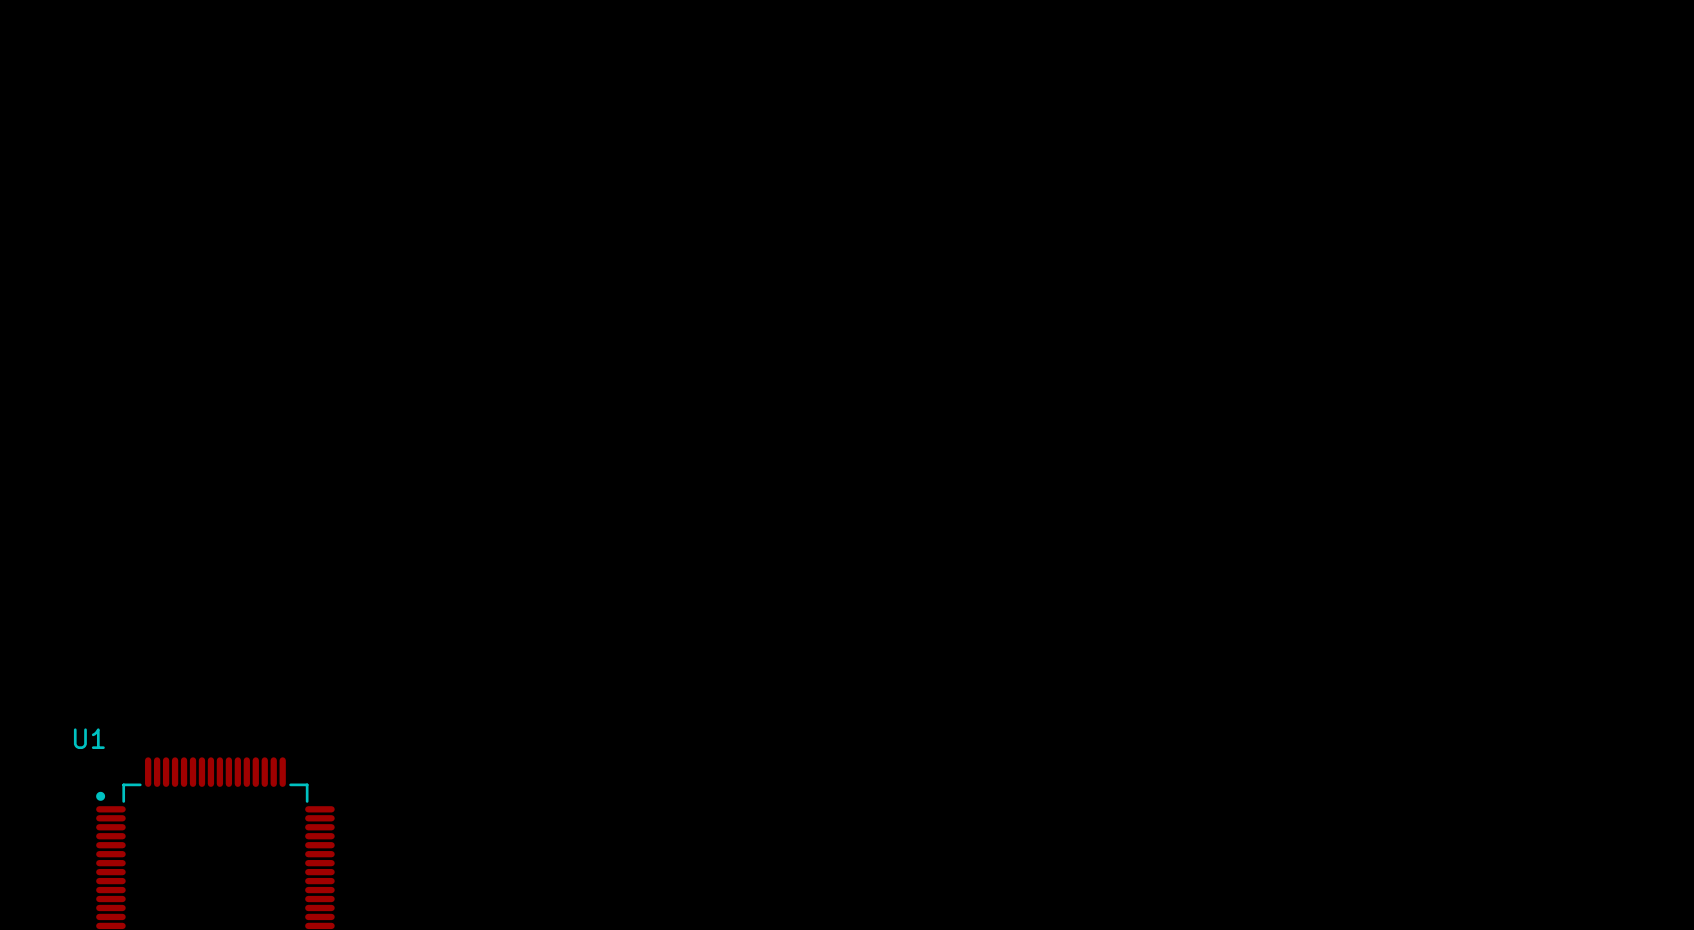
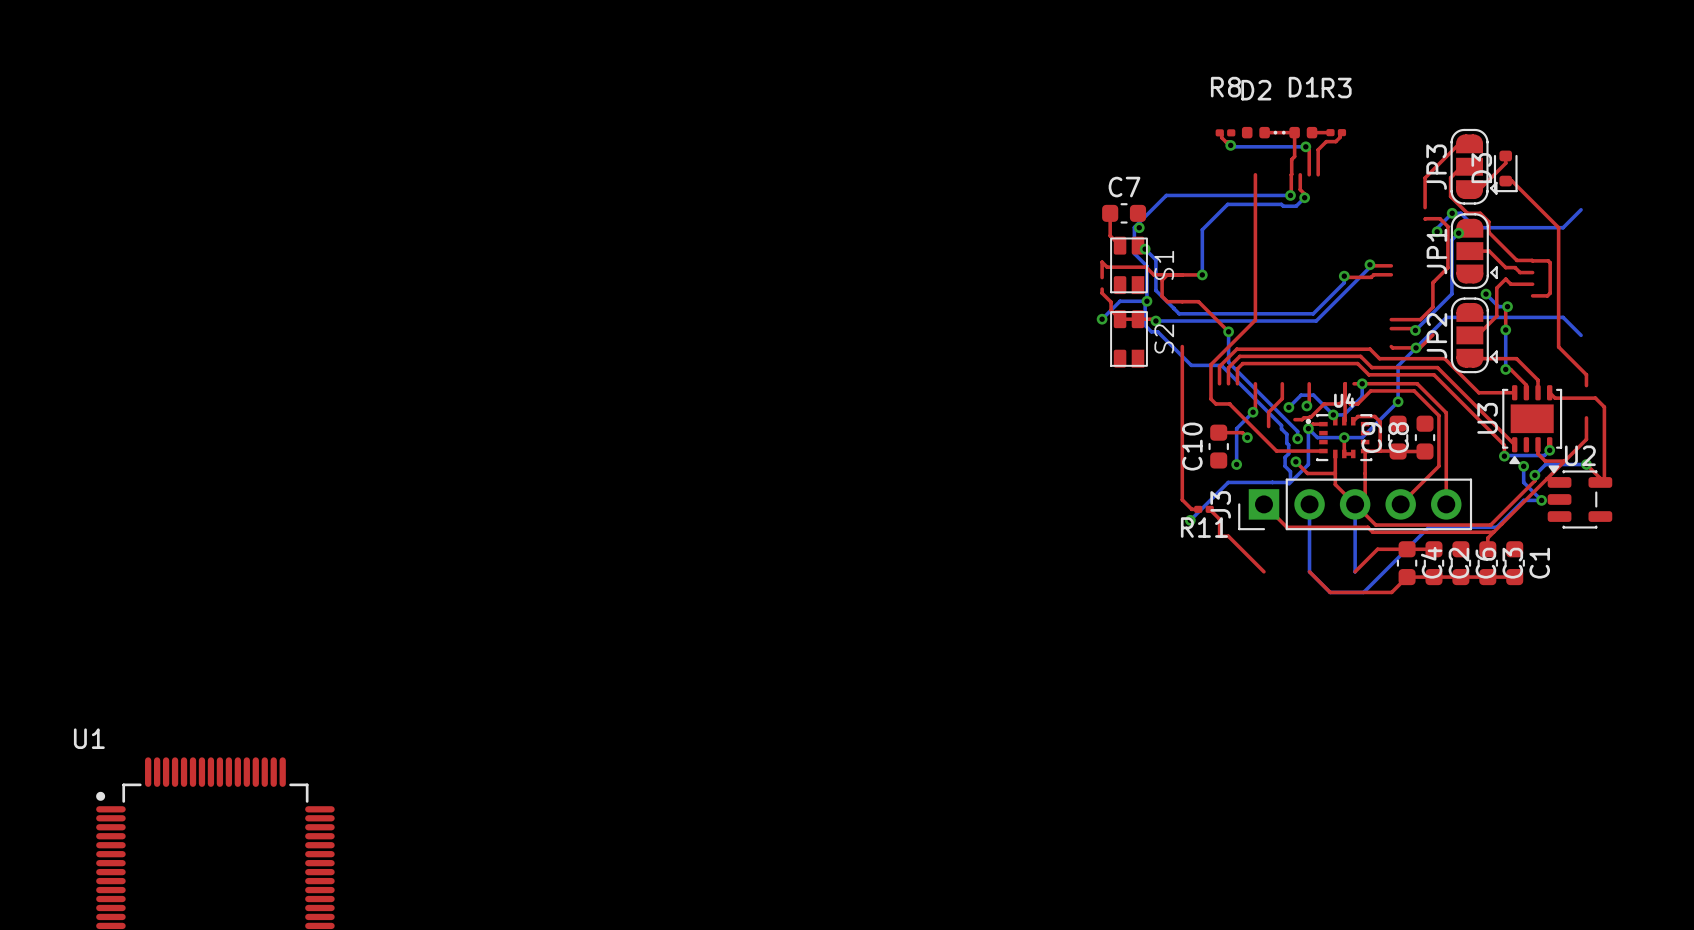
top track: none -> (1219, 132) (1221, 137) (1230, 145)
R8: none -> (1225, 132)
D2: none -> (1259, 132)
top track: none -> (1264, 132) (1294, 132) (1294, 156) (1291, 159) (1290, 195)
D1: none -> (1299, 132)
top track: none -> (1312, 132) (1330, 132)
R3: none -> (1336, 132)
top track: none -> (1341, 132) (1340, 132) (1340, 137) (1335, 141) (1326, 141) (1318, 149) (1318, 174)
top track: none -> (1469, 143) (1459, 143) (1425, 177) (1425, 207)
bottom track: none -> (1230, 145) (1305, 146)
via: none -> (1230, 145)
top track: none -> (1305, 146) (1309, 150) (1309, 174)
via: none -> (1305, 146)
top track: none -> (1505, 155) (1505, 163) (1478, 190) (1469, 190)
JP3: none -> (1474, 166)
top track: none -> (1477, 166) (1461, 166) (1450, 177) (1450, 196) (1467, 213) (1480, 213) (1488, 221) (1488, 232) (1516, 260) (1548, 260) (1550, 262) (1550, 293) (1547, 295) (1532, 295)
D3: none -> (1505, 171)
top track: none -> (1255, 174) (1255, 320) (1210, 364) (1210, 399) (1215, 403) (1229, 403) (1276, 451) (1323, 451)
top track: none -> (1300, 174) (1300, 189) (1304, 194) (1304, 197)
top track: none -> (1505, 181) (1512, 181) (1558, 227) (1558, 346) (1586, 374) (1586, 385)
bottom track: none -> (1290, 195) (1166, 195) (1134, 227) (1134, 253) (1146, 266) (1146, 301)
via: none -> (1290, 195)
bottom track: none -> (1304, 197) (1296, 206) (1227, 204) (1202, 229) (1202, 274)
via: none -> (1304, 197)
bottom track: none -> (1581, 209) (1563, 227) (1475, 227) (1460, 213) (1452, 213) (1437, 228) (1437, 231)
top track: none -> (1110, 213) (1110, 235) (1120, 245)
C7: none -> (1124, 213)
via: none -> (1452, 213)
top track: none -> (1425, 219) (1440, 218) (1447, 226) (1447, 267) (1432, 282) (1432, 307) (1420, 319) (1391, 319)
via: none -> (1139, 227)
via: none -> (1437, 231)
bottom track: none -> (1458, 233) (1451, 239) (1451, 293) (1415, 330)
via: none -> (1458, 233)
bottom track: none -> (1145, 249) (1155, 259) (1155, 290) (1179, 313) (1313, 313) (1344, 282) (1344, 276)
via: none -> (1145, 249)
top track: none -> (1469, 251) (1489, 251) (1505, 267) (1515, 267) (1520, 272) (1532, 272)
JP1: none -> (1474, 251)
top track: none -> (1369, 264) (1391, 265)
bottom track: none -> (1369, 264) (1369, 267) (1316, 321) (1155, 321)
via: none -> (1369, 264)
S1: none -> (1129, 265)
top track: none -> (1167, 274) (1162, 280) (1162, 296) (1167, 301) (1198, 301) (1228, 331)
top track: none -> (1182, 274) (1153, 274) (1146, 267) (1107, 267) (1102, 262) (1102, 277)
top track: none -> (1182, 274) (1202, 274)
via: none -> (1202, 274)
top track: none -> (1391, 274) (1373, 274) (1371, 277) (1344, 276)
via: none -> (1344, 276)
top track: none -> (1532, 284) (1510, 284) (1505, 279) (1496, 288) (1496, 316) (1477, 335) (1469, 335)
top track: none -> (1102, 289) (1102, 293) (1111, 302) (1111, 310) (1120, 319) (1154, 319) (1155, 321)
bottom track: none -> (1486, 294) (1498, 306) (1507, 306)
via: none -> (1486, 294)
bottom track: none -> (1146, 301) (1120, 301) (1102, 319)
bottom track: none -> (1146, 301) (1145, 303) (1145, 325) (1151, 331) (1157, 331) (1191, 365) (1221, 365) (1281, 425) (1281, 428) (1286, 434) (1288, 453) (1285, 457) (1285, 466) (1290, 471) (1290, 479) (1287, 482) (1228, 482) (1190, 520)
via: none -> (1146, 301)
top track: none -> (1507, 306) (1505, 308) (1505, 329)
via: none -> (1507, 306)
via: none -> (1102, 319)
via: none -> (1155, 321)
top track: none -> (1391, 328) (1413, 328) (1415, 330)
bottom track: none -> (1505, 329) (1505, 369)
via: none -> (1505, 329)
via: none -> (1415, 330)
bottom track: none -> (1228, 331) (1228, 362) (1297, 431) (1297, 438)
via: none -> (1228, 331)
top track: none -> (1432, 335) (1420, 347) (1391, 346)
JP2: none -> (1474, 335)
bottom track: none -> (1581, 335) (1563, 317) (1446, 317) (1398, 365) (1398, 401) (1362, 437) (1317, 437) (1308, 428) (1308, 464) (1289, 483)
S2: none -> (1129, 338)
top track: none -> (1182, 346) (1182, 499) (1191, 509) (1198, 509)
via: none -> (1416, 347)
top track: none -> (1469, 358) (1516, 358) (1538, 380) (1538, 392)
top track: none -> (1505, 369) (1510, 369) (1526, 385) (1526, 392)
via: none -> (1505, 369)
top track: none -> (1219, 383) (1219, 366) (1236, 349) (1370, 349) (1379, 358) (1444, 358) (1478, 392) (1514, 392)
top track: none -> (1228, 383) (1228, 367) (1239, 356) (1360, 356) (1371, 367) (1437, 367) (1514, 444)
top track: none -> (1237, 383) (1237, 368) (1242, 363) (1357, 363) (1368, 374) (1433, 374) (1504, 445) (1504, 456)
top track: none -> (1255, 383) (1255, 409) (1253, 412)
top track: none -> (1282, 383) (1282, 398) (1268, 412) (1268, 426)
top track: none -> (1309, 383) (1309, 403) (1306, 405)
top track: none -> (1345, 383) (1344, 421)
top track: none -> (1354, 383) (1417, 383) (1446, 412) (1446, 504)
bottom track: none -> (1362, 383) (1362, 396) (1343, 414) (1333, 414) (1313, 395) (1301, 395) (1288, 407)
via: none -> (1362, 383)
top track: none -> (1549, 392) (1555, 398) (1595, 398) (1604, 407) (1604, 478) (1600, 482) (1600, 478) (1586, 464)
via: none -> (1398, 401)
via: none -> (1306, 405)
via: none -> (1288, 407)
bottom track: none -> (1253, 412) (1236, 428) (1236, 464)
via: none -> (1253, 412)
via: none -> (1333, 414)
top track: none -> (1586, 417) (1586, 439) (1487, 538) (1487, 549)
top track: none -> (1294, 419) (1309, 417) (1324, 403) (1339, 403) (1345, 398) (1350, 403) (1357, 403) (1370, 390) (1414, 390) (1438, 415) (1438, 466) (1400, 504)
top track: none -> (1353, 421) (1357, 416) (1374, 416) (1380, 421) (1380, 451)
top track: none -> (1323, 424) (1312, 424) (1308, 428)
U3: none -> (1532, 424)
via: none -> (1308, 428)
top track: none -> (1218, 432) (1242, 432) (1247, 437)
via: none -> (1247, 437)
U4: none -> (1339, 437)
top track: none -> (1344, 437) (1344, 453) (1353, 453)
via: none -> (1344, 437)
C9: none -> (1398, 437)
C8: none -> (1425, 437)
via: none -> (1297, 438)
top track: none -> (1538, 444) (1538, 453) (1545, 461) (1564, 461)
C10: none -> (1218, 446)
bottom track: none -> (1549, 450) (1544, 455) (1504, 456)
via: none -> (1549, 450)
top track: none -> (1425, 451) (1365, 451) (1365, 494) (1355, 504)
top track: none -> (1335, 453) (1335, 484) (1375, 525) (1490, 525) (1534, 480) (1534, 475)
via: none -> (1504, 456)
top track: none -> (1295, 461) (1307, 473) (1335, 473)
via: none -> (1295, 461)
via: none -> (1236, 464)
bottom track: none -> (1586, 464) (1545, 464) (1534, 475)
via: none -> (1586, 464)
bottom track: none -> (1523, 466) (1523, 482) (1541, 500) (1523, 500) (1496, 527) (1428, 527) (1363, 592) (1330, 592) (1309, 571) (1309, 504)
via: none -> (1523, 466)
via: none -> (1534, 475)
U2: none -> (1579, 496)
via: none -> (1541, 500)
top track: none -> (1264, 504) (1286, 527) (1367, 527) (1372, 532) (1493, 532)
bottom track: none -> (1355, 504) (1355, 571)
J3: none -> (1355, 504)
R11: none -> (1204, 509)
top track: none -> (1209, 509) (1219, 519) (1219, 536) (1228, 536) (1263, 571)
via: none -> (1190, 520)
top track: none -> (1433, 549) (1377, 549) (1355, 571)
C4: none -> (1407, 563)
C2: none -> (1433, 563)
C6: none -> (1460, 563)
C3: none -> (1487, 563)
C1: none -> (1514, 563)
top track: none -> (1309, 571) (1330, 592) (1391, 592) (1407, 577) (1514, 577)

